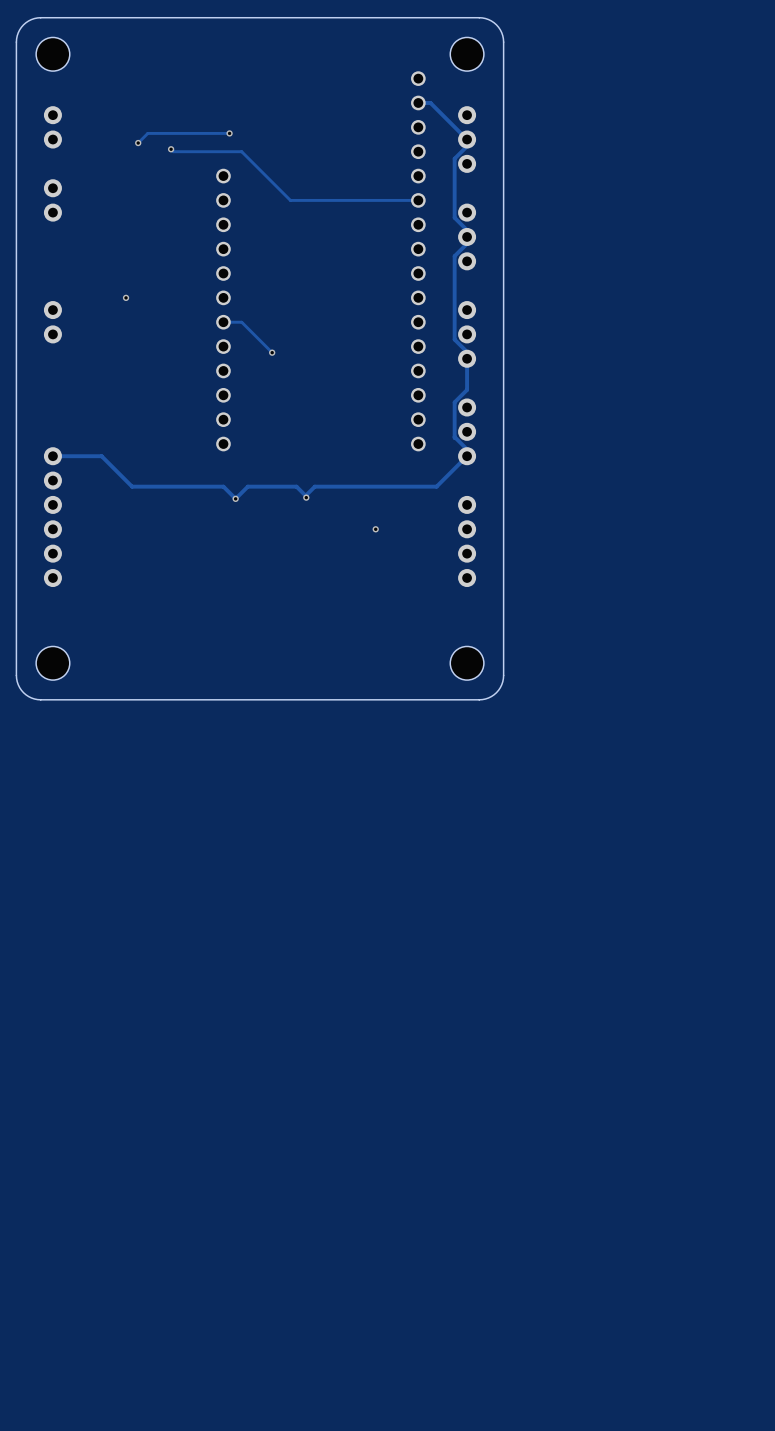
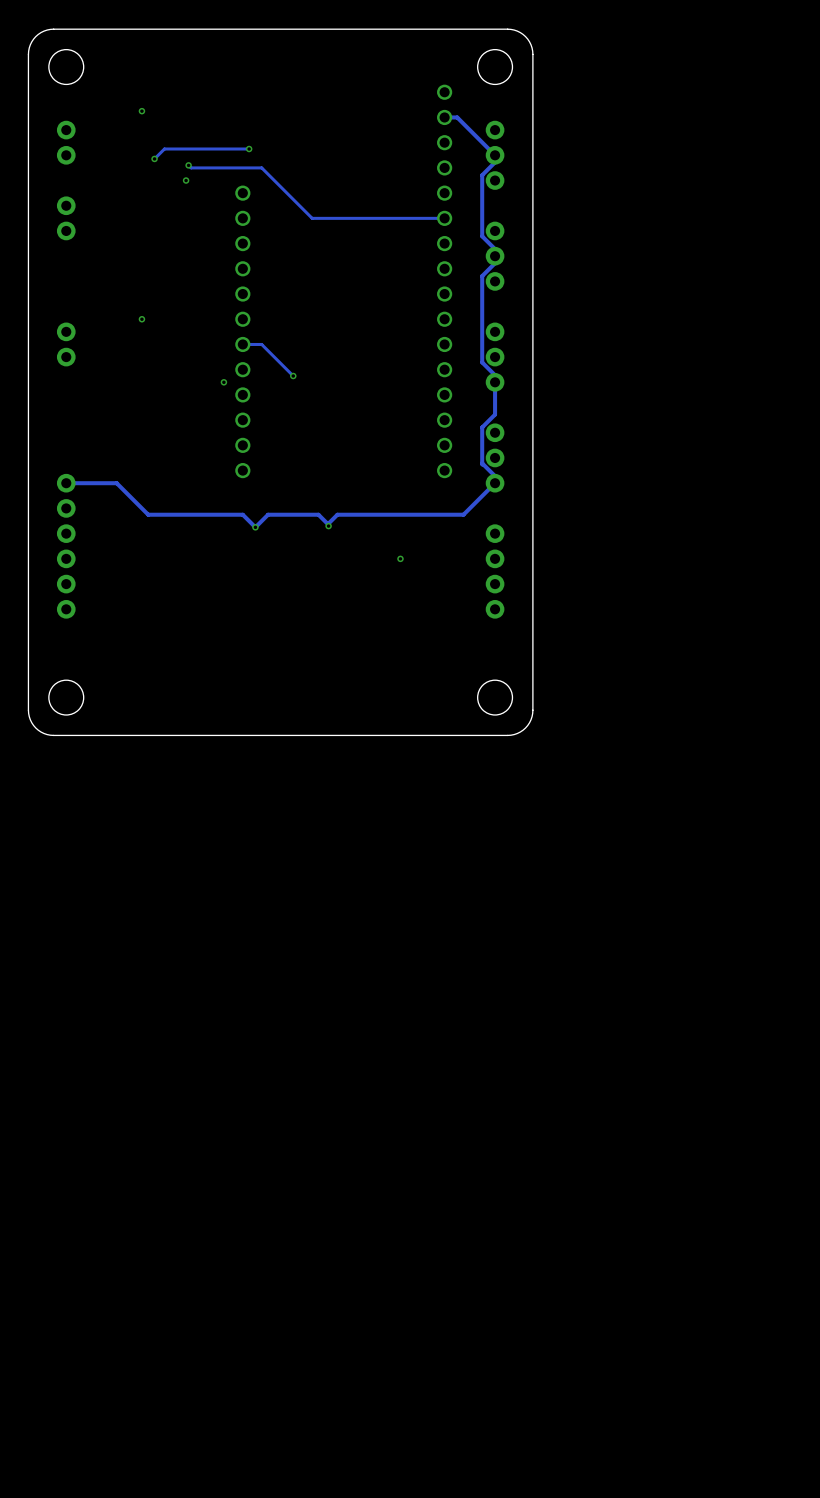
via: none -> (141, 111)
via: none -> (186, 180)
via: none -> (223, 382)

